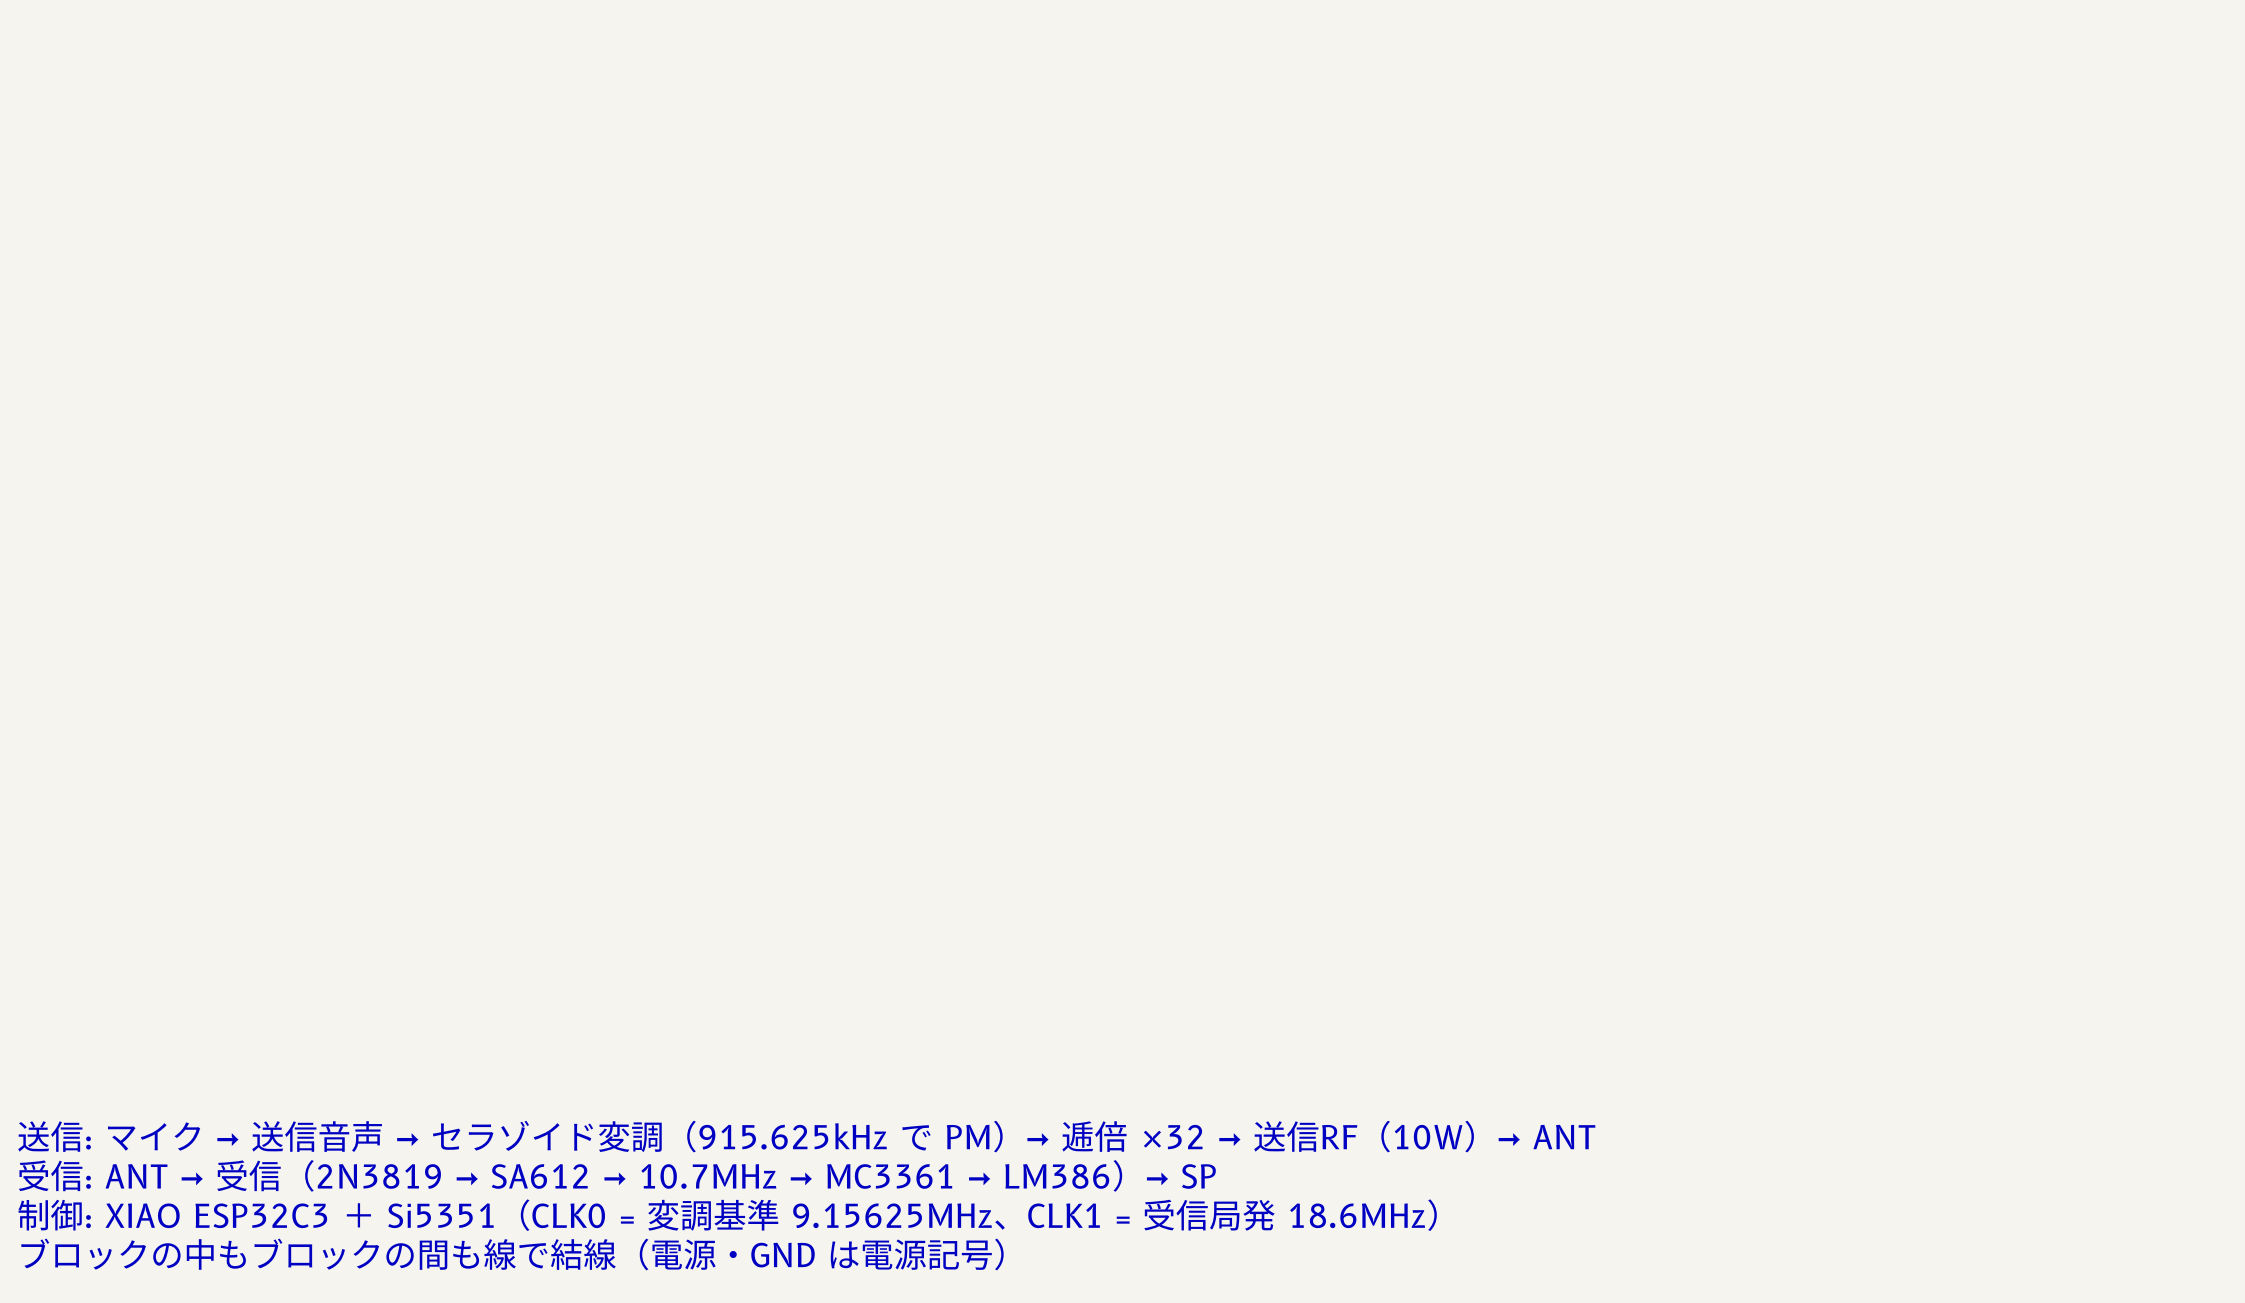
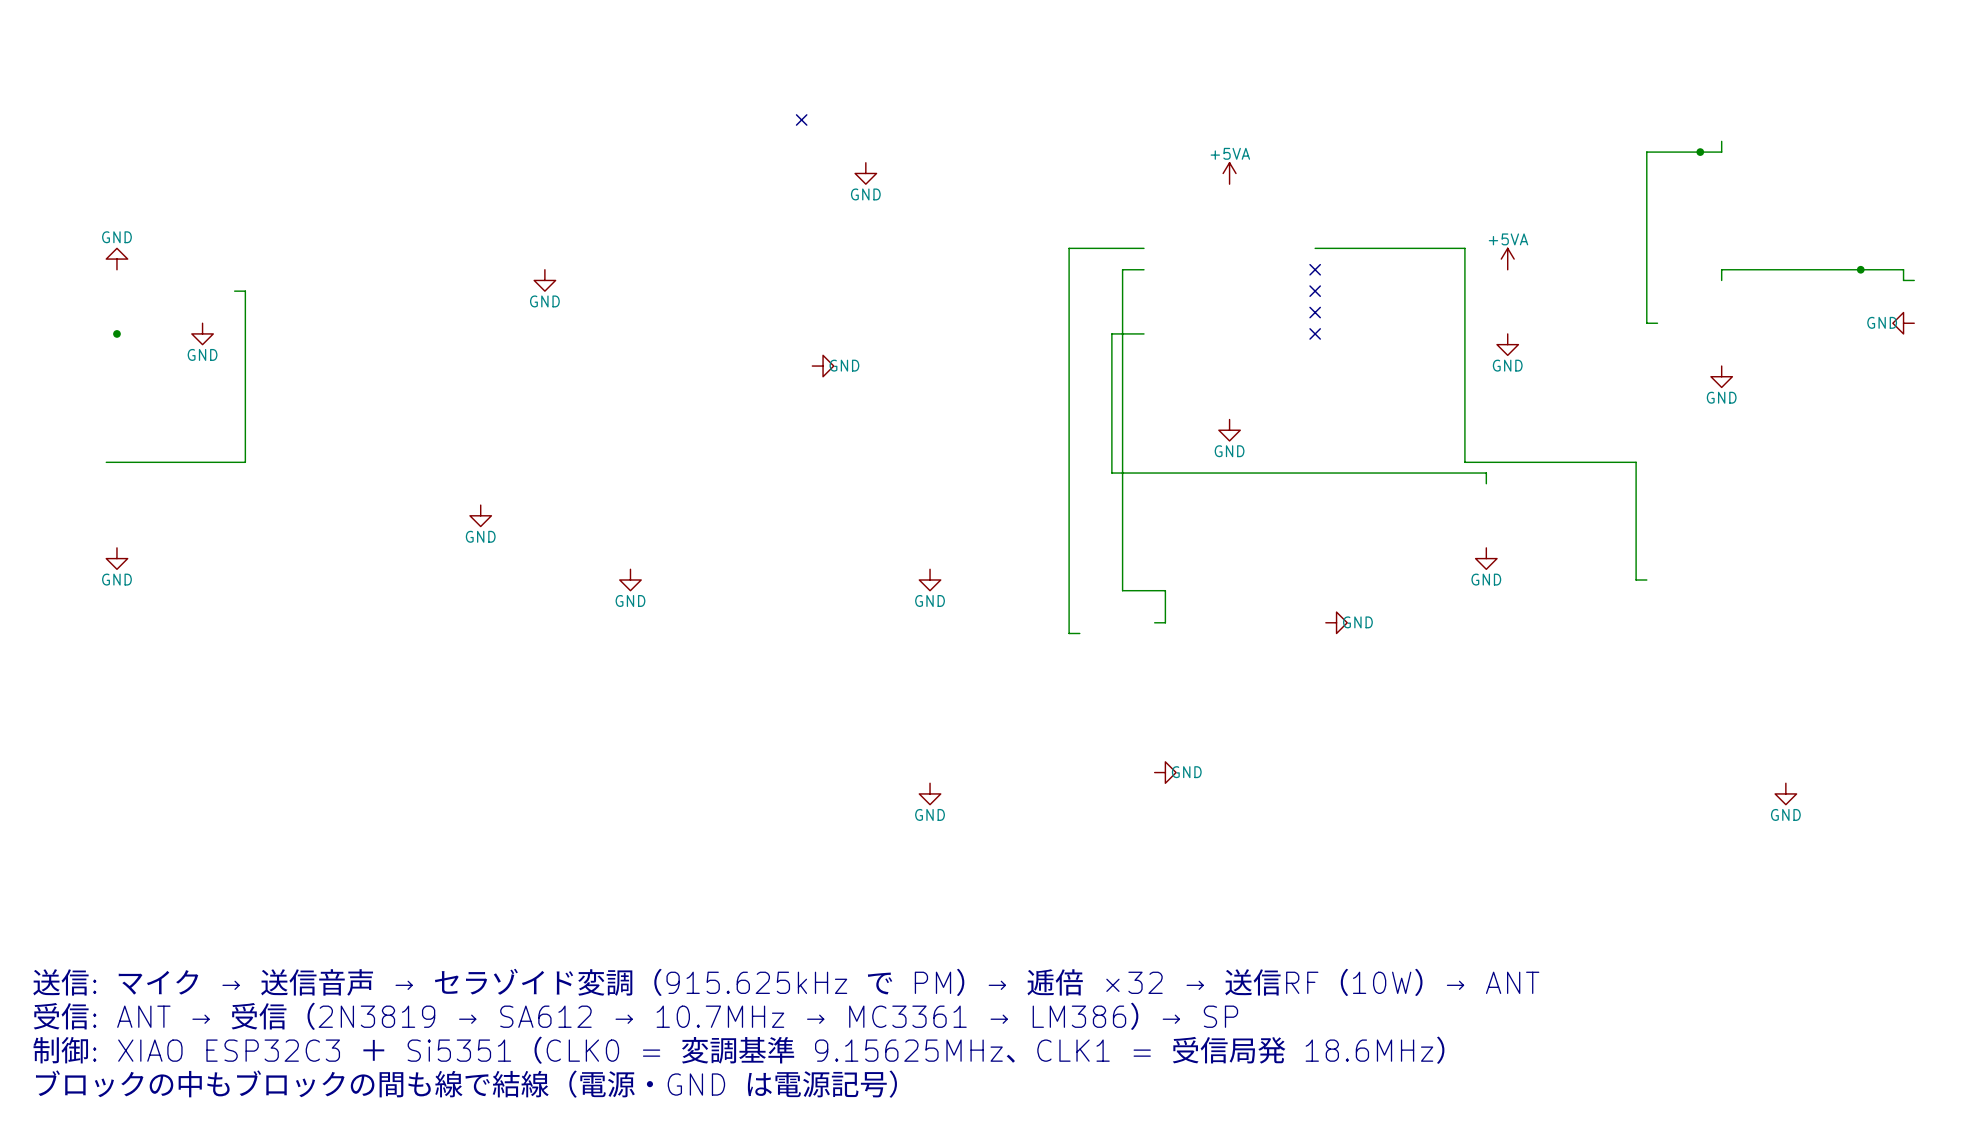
no-connect mark: none -> (801, 119)
wire: none -> (1721, 141) (1721, 152) (1646, 152) (1646, 323) (1657, 323)
junction: none -> (1700, 152)
power symbol: none -> GND (865, 173)
power symbol: none -> +5VA (1229, 173)
wire: none -> (1143, 248) (1069, 248) (1069, 633) (1079, 633)
wire: none -> (1315, 248) (1464, 248) (1464, 462) (1636, 462) (1636, 579) (1646, 579)
power symbol: none -> GND (116, 259)
power symbol: none -> +5VA (1507, 259)
wire: none -> (1143, 269) (1122, 269) (1122, 590) (1165, 590) (1165, 622) (1154, 622)
no-connect mark: none -> (1315, 269)
junction: none -> (1860, 269)
power symbol: none -> GND (544, 280)
wire: none -> (1721, 280) (1721, 269) (1903, 269) (1903, 280) (1914, 280)
wire: none -> (234, 291) (245, 291) (245, 462) (106, 462)
no-connect mark: none -> (1315, 291)
no-connect mark: none -> (1315, 312)
power symbol: none -> GND (1903, 323)
junction: none -> (116, 333)
power symbol: none -> GND (202, 333)
wire: none -> (1143, 333) (1111, 333) (1111, 473) (1486, 473) (1486, 483)
no-connect mark: none -> (1315, 333)
power symbol: none -> GND (1507, 344)
power symbol: none -> GND (823, 366)
power symbol: none -> GND (1721, 376)
power symbol: none -> GND (1229, 430)
power symbol: none -> GND (480, 515)
power symbol: none -> GND (116, 558)
power symbol: none -> GND (1486, 558)
power symbol: none -> GND (630, 579)
power symbol: none -> GND (930, 579)
power symbol: none -> GND (1336, 622)
power symbol: none -> GND (1165, 772)
power symbol: none -> GND (930, 793)
power symbol: none -> GND (1785, 793)

